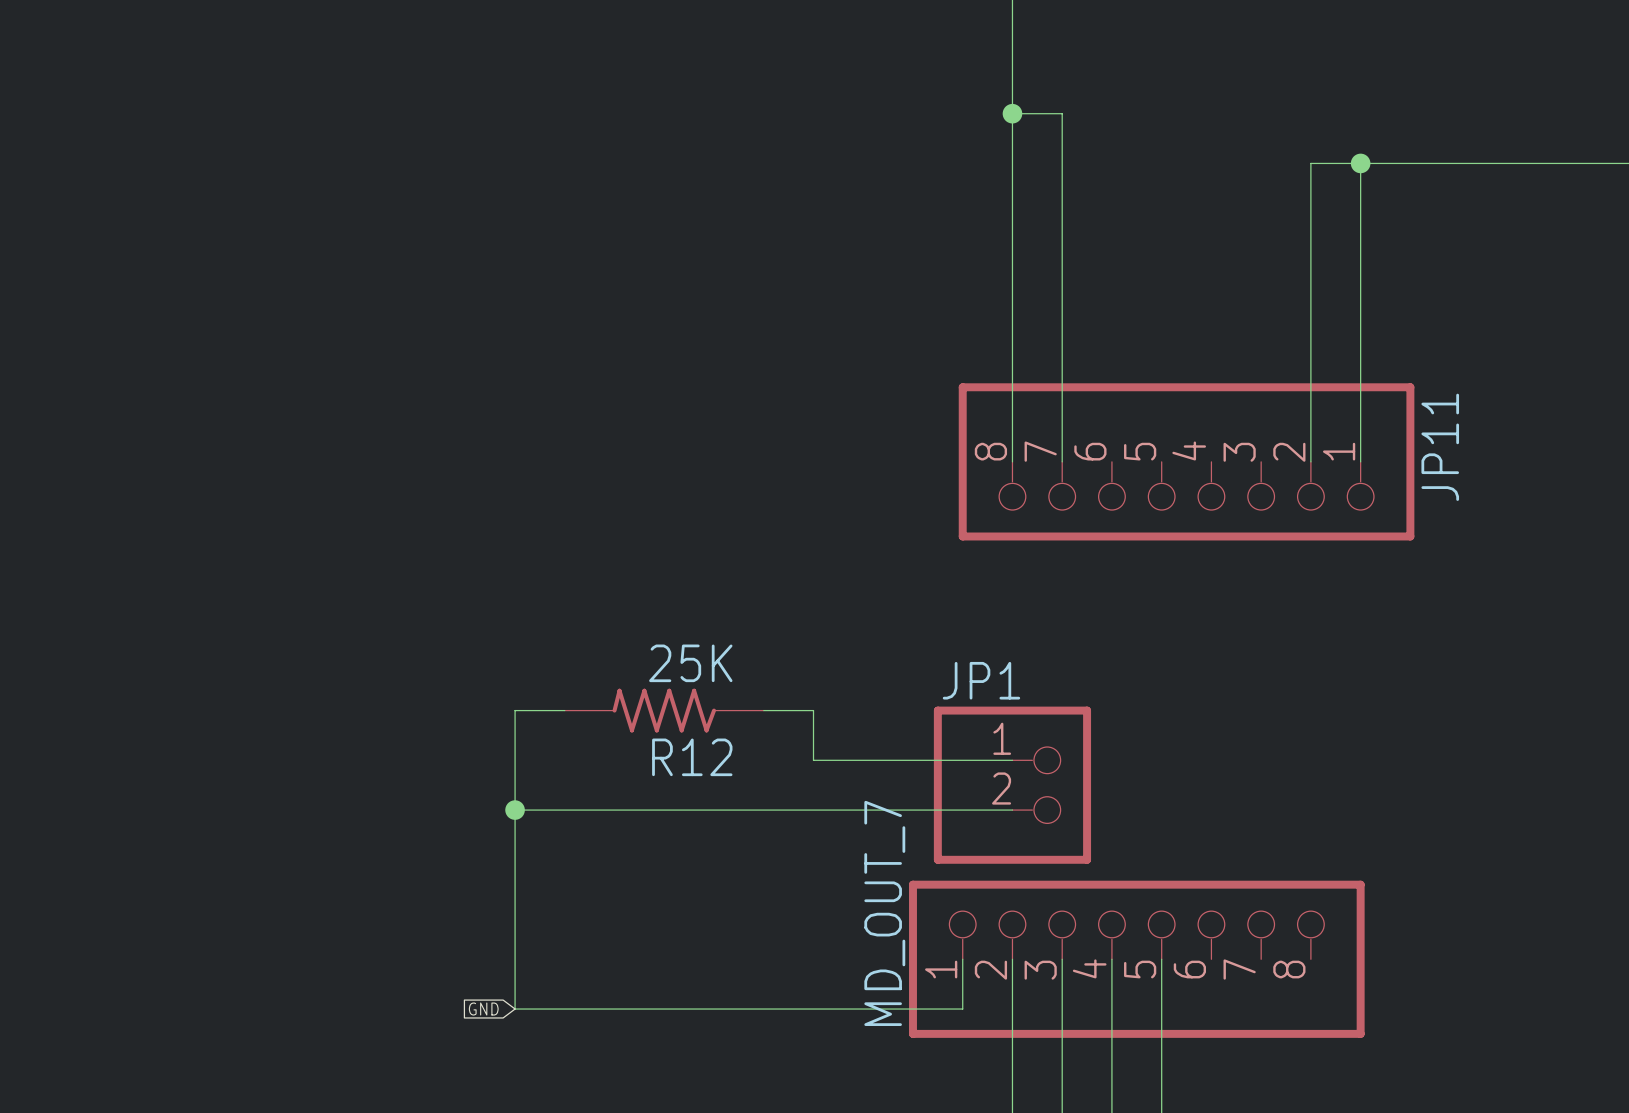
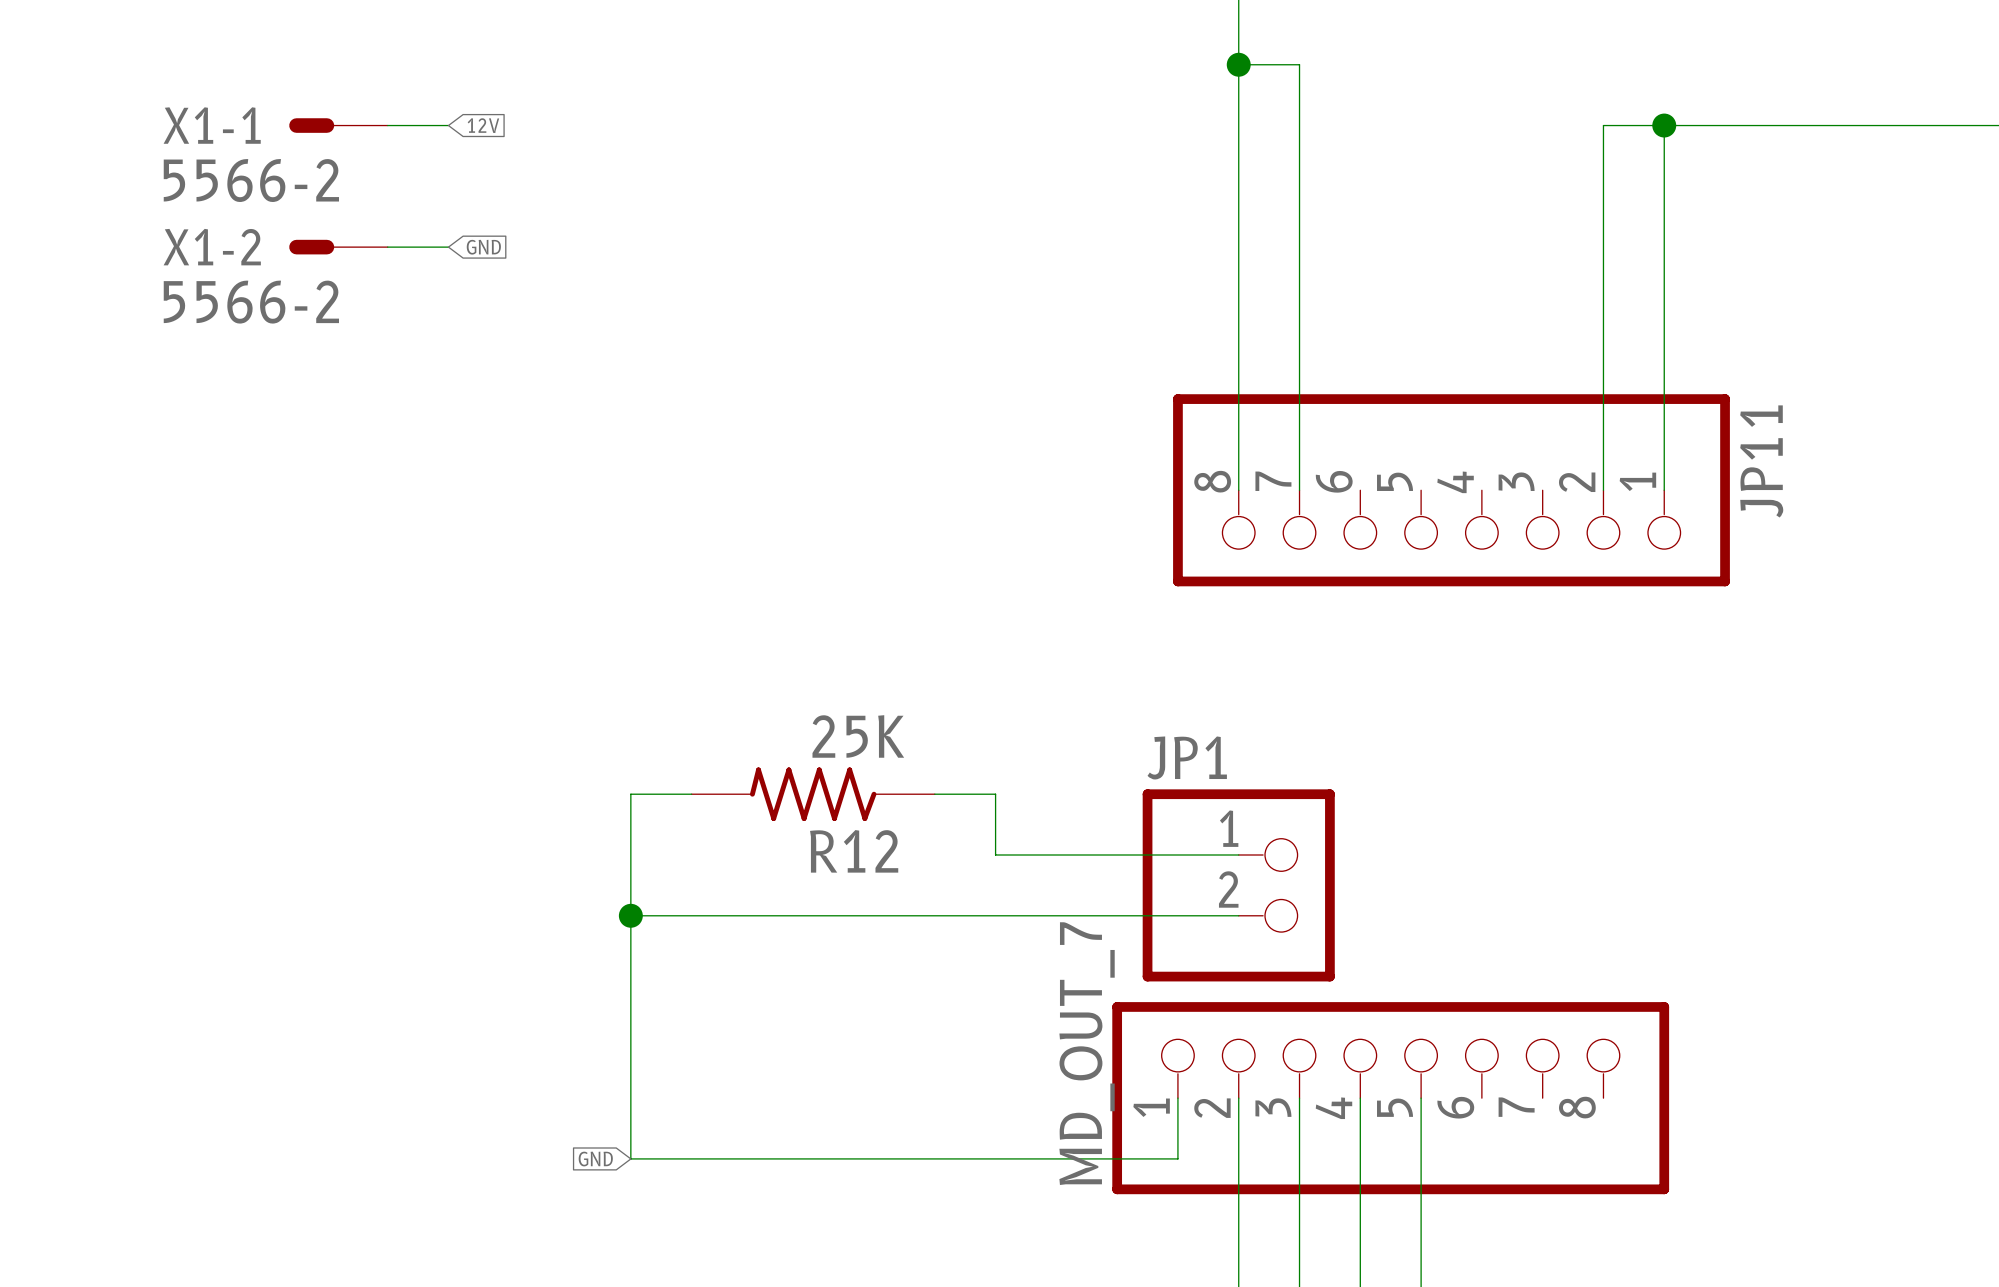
X1-1: none -> 5566-2 (338, 125)
wire: none -> (387, 125) (448, 125)
global label: none -> 12V (483, 125)
X1-2: none -> 5566-2 (338, 247)
wire: none -> (387, 247) (448, 247)
global label: none -> GND (483, 247)

